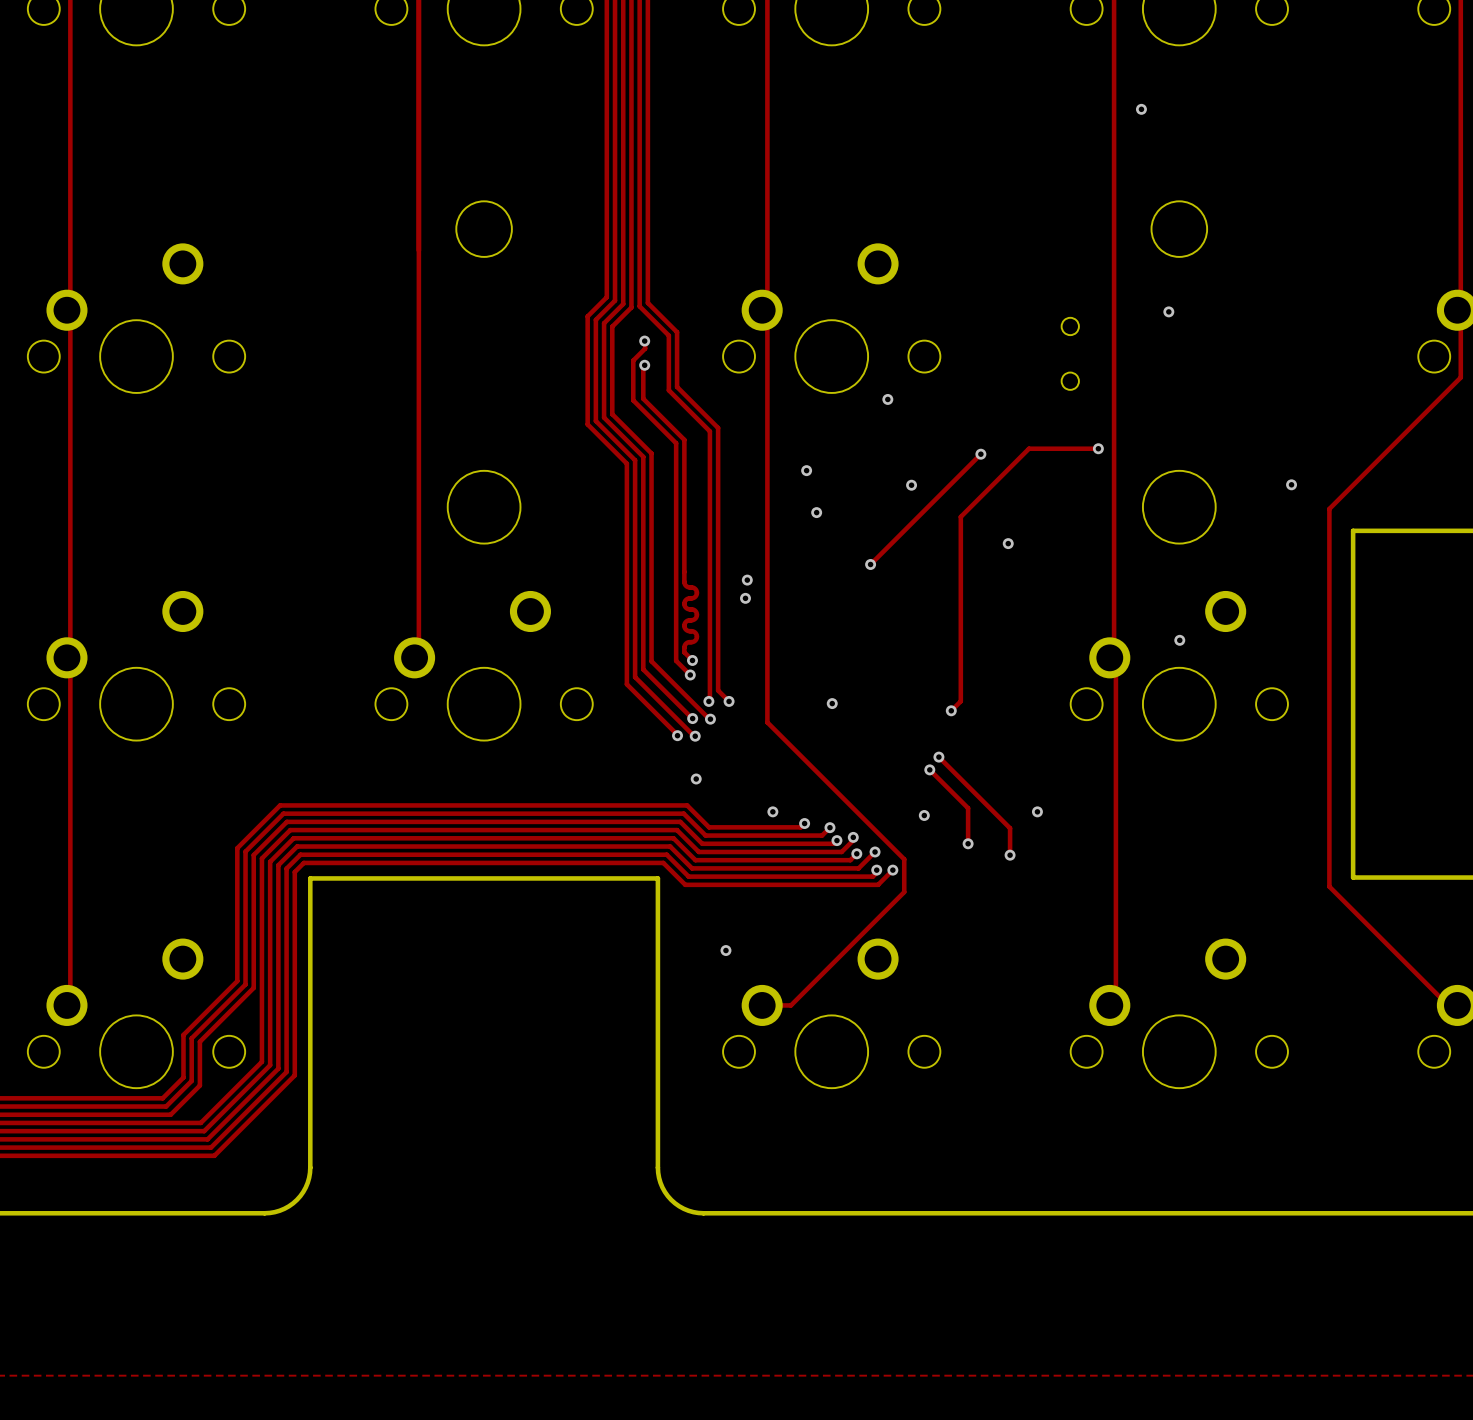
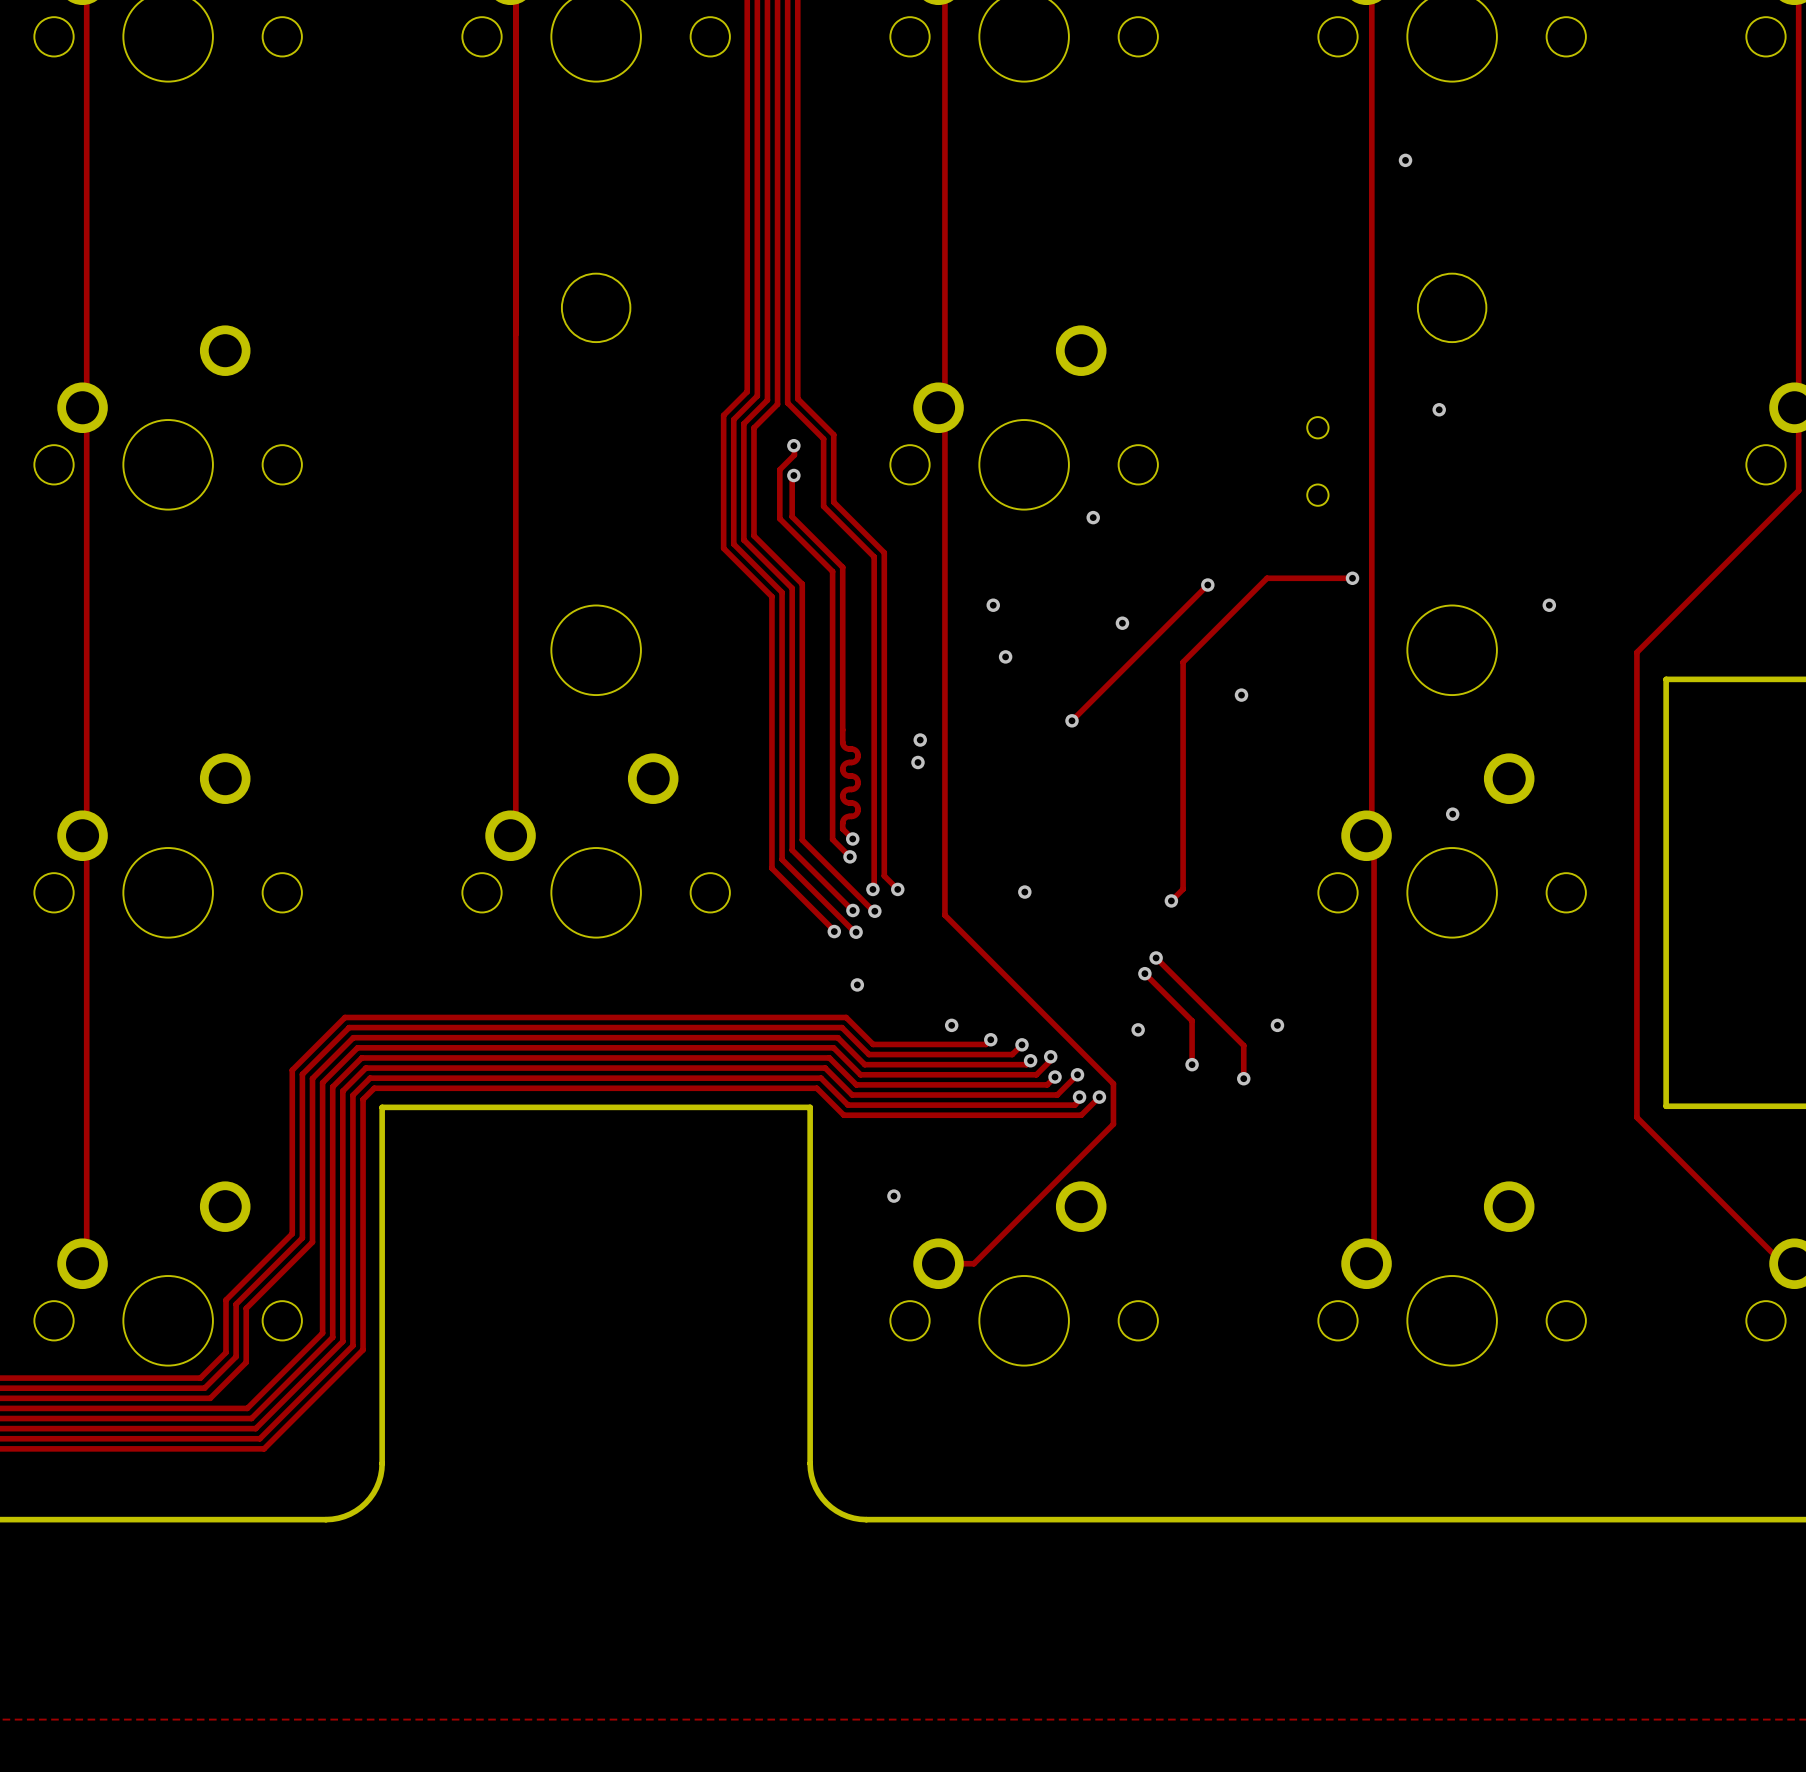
via position: (1291, 484) -> (1549, 605)

